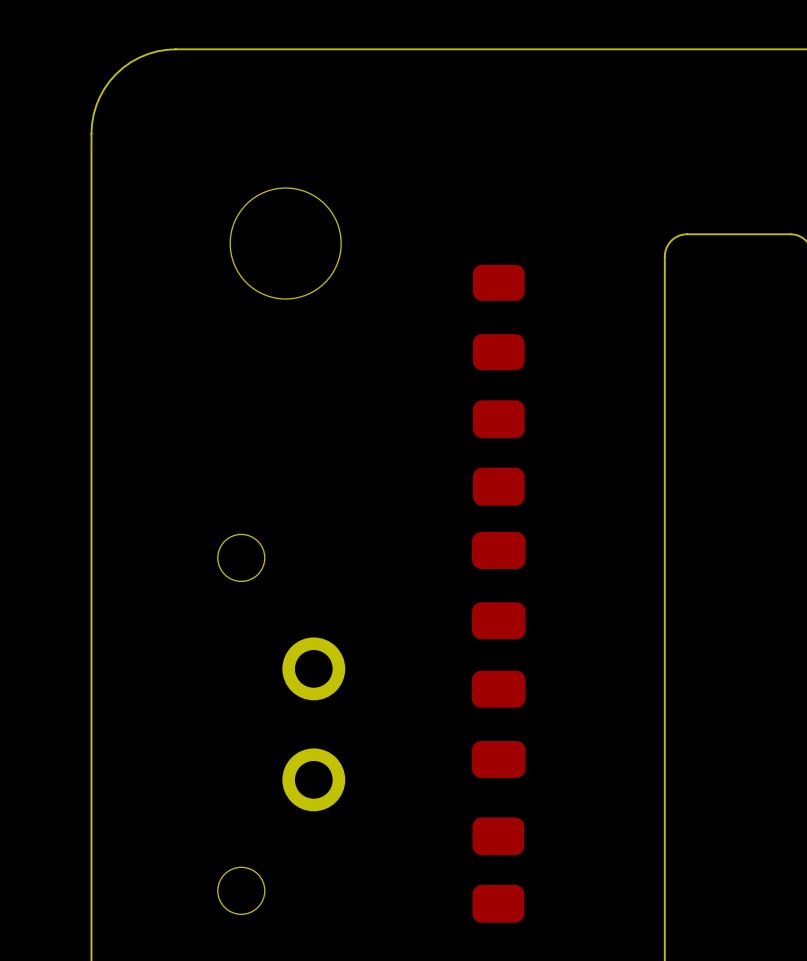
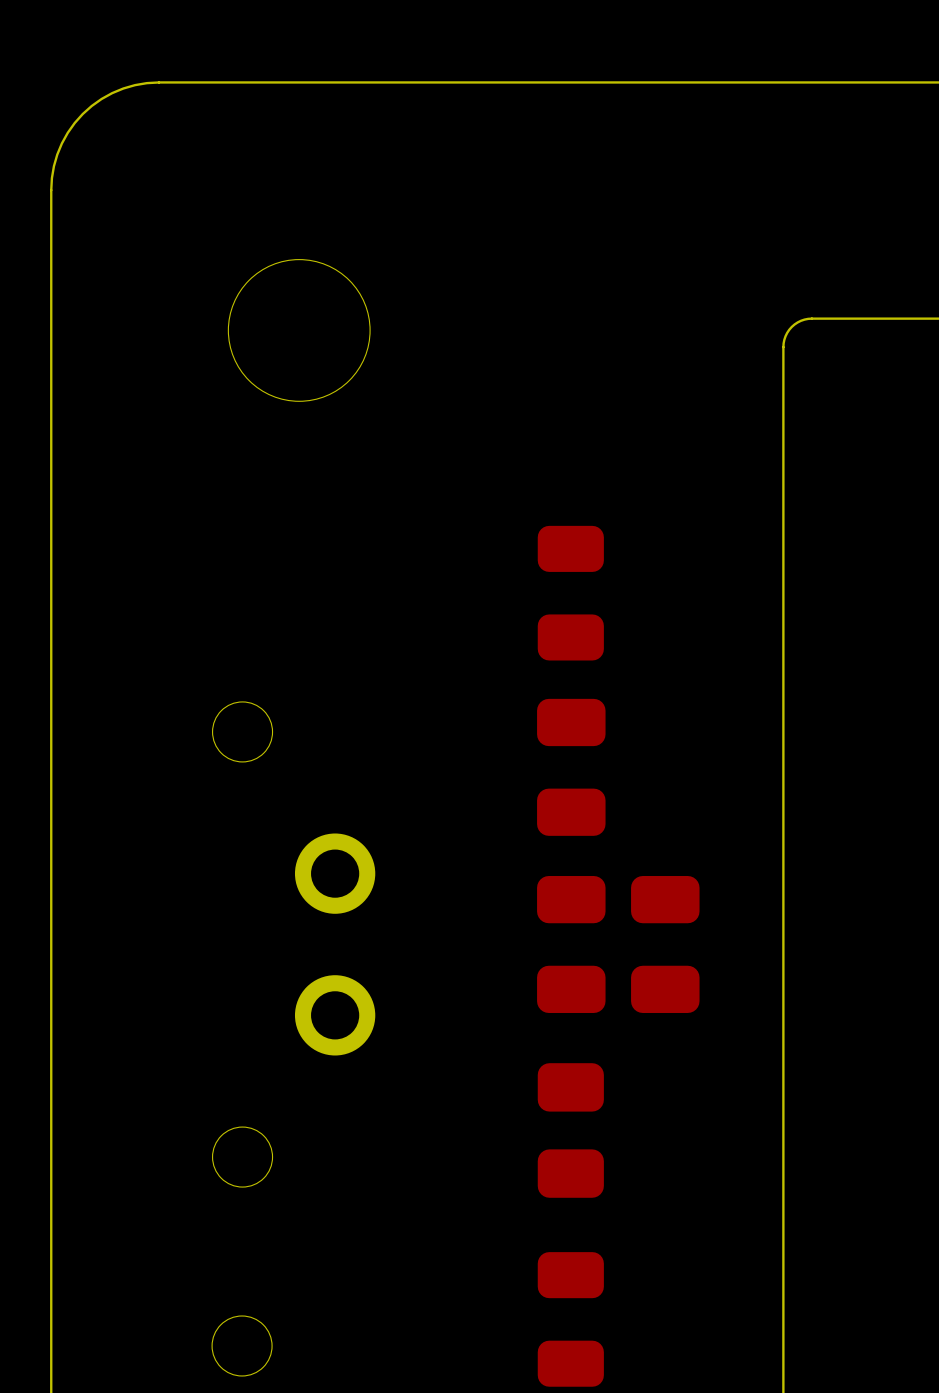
part: (498, 317) -> none
part footprint: [472, 400, 525, 506] -> [537, 525, 604, 661]
part: none -> (665, 944)

